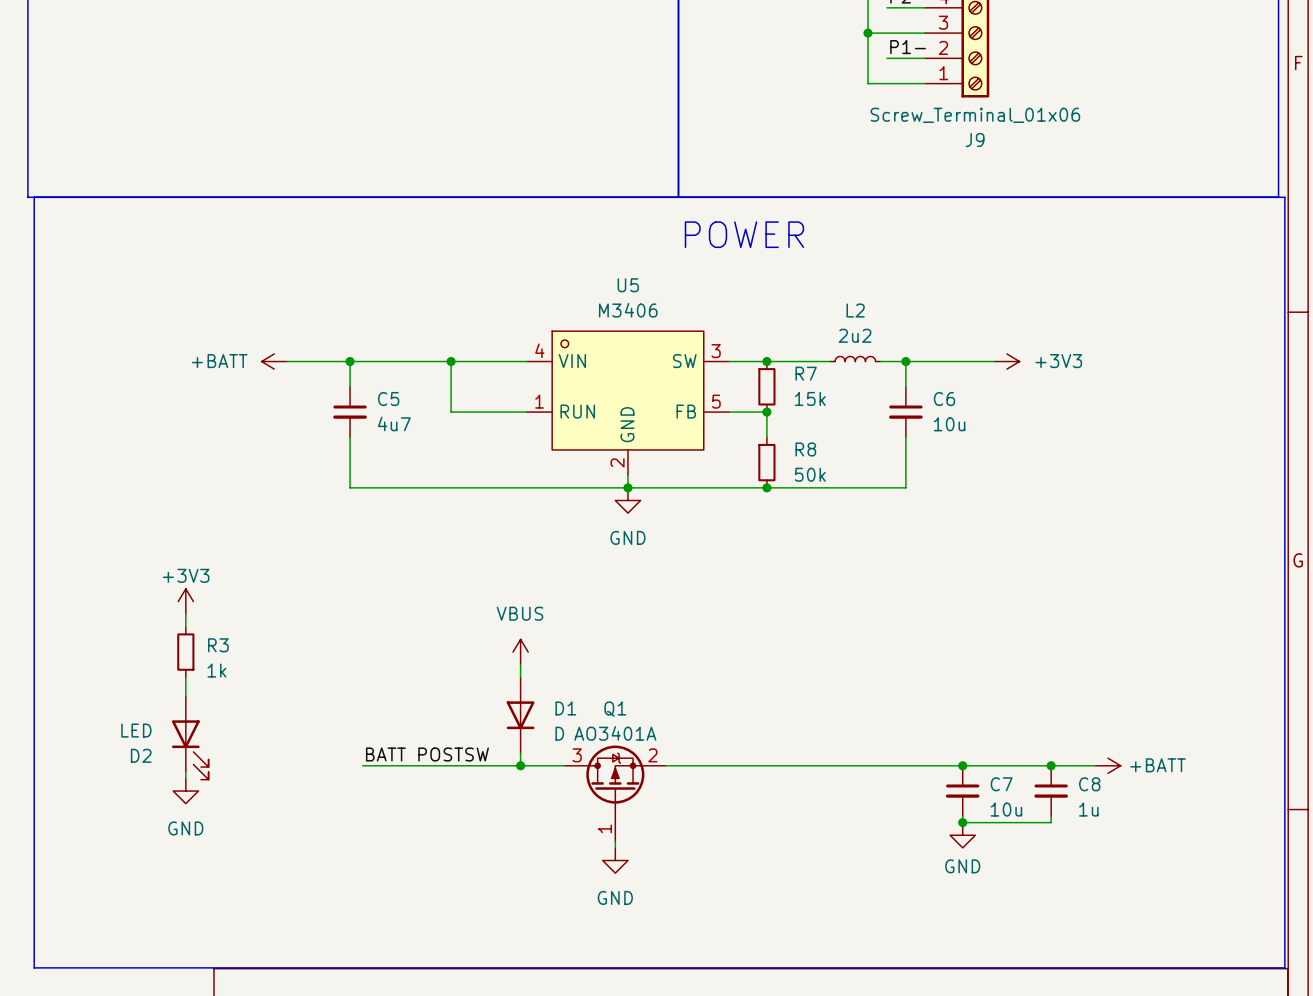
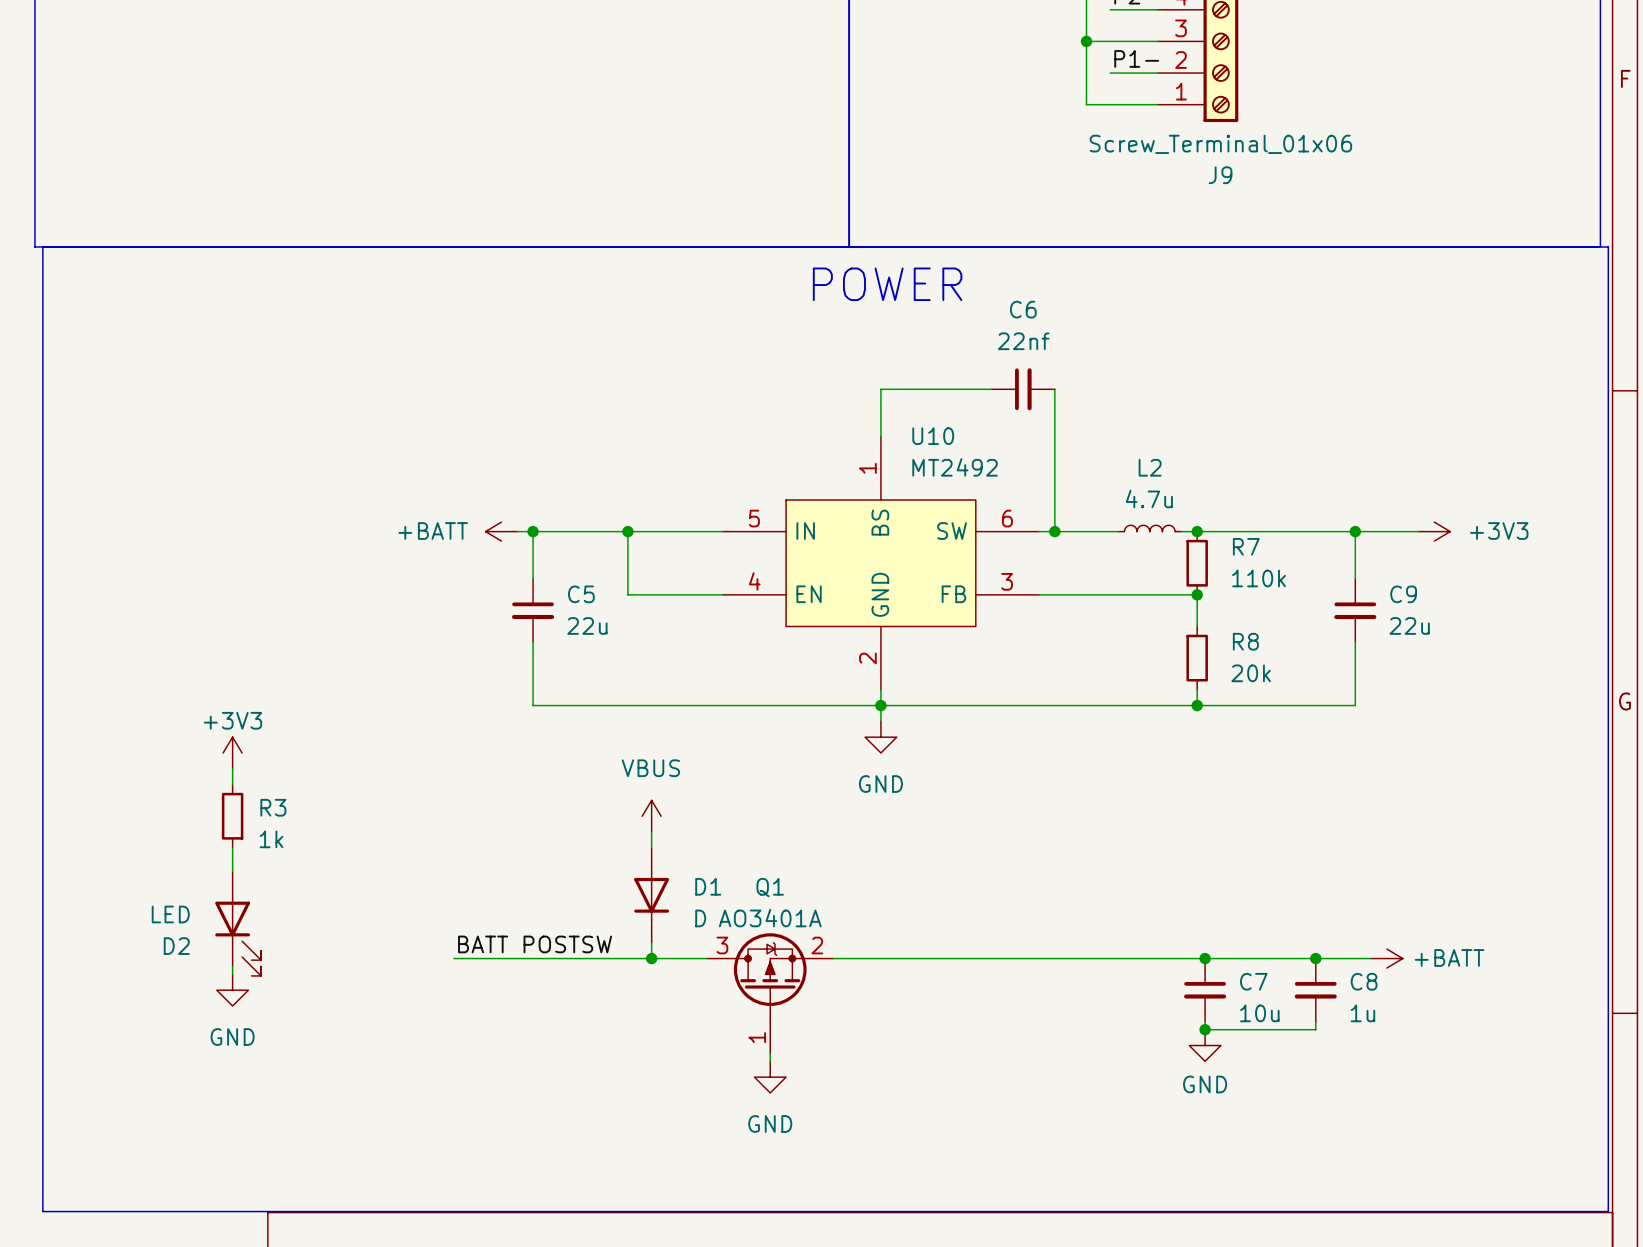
text position: POWER (744, 234) -> POWER (887, 284)
wire: none -> (991, 389) (880, 389) (880, 436)
wire: none -> (1054, 389) (1054, 531)
L2 value: 2u2 (855, 335) -> 4.7u (1149, 499)
L2 position: (855, 359) -> (1149, 528)
power symbol position: +BATT (274, 361) -> +BATT (501, 531)
wire: (286, 361) (526, 361) -> none
wire: (350, 361) (350, 386) -> none
junction: (350, 361) -> none
wire: (451, 361) (451, 412) (526, 412) -> (627, 531) (627, 594) (722, 594)
junction: (451, 361) -> none
wire: (729, 361) (830, 361) -> none
junction: (766, 361) -> none
wire: (880, 361) (994, 361) -> none
wire: (905, 361) (905, 386) -> none
junction: (905, 361) -> none
power symbol position: +3V3 (1006, 361) -> +3V3 (1434, 531)
R7 position: (766, 386) -> (1197, 563)
R7 value: 15k (810, 398) -> 110k (1259, 578)
C6 name position: C6 (944, 399) -> C6 (1023, 309)
U5: M3406 (627, 403) -> none
C5 position: (350, 412) -> (533, 610)
junction: (766, 412) -> none
C6 rotation: 0° (905, 412) -> 90° counterclockwise (1023, 389)
C6 position: (905, 412) -> (1023, 389)
C5 value: 4u7 (394, 423) -> 22u (587, 625)
wire: none -> (517, 531) (722, 531)
wire: none -> (533, 531) (533, 579)
junction: none -> (533, 531)
junction: none -> (627, 531)
wire: none -> (1039, 531) (1118, 531)
junction: none -> (1054, 531)
wire: none -> (1181, 531) (1418, 531)
C6 value: 10u (949, 424) -> 22nf (1023, 341)
junction: none -> (1197, 531)
wire: none -> (1355, 531) (1355, 579)
junction: none -> (1355, 531)
wire: (350, 437) (350, 487) (905, 487) (905, 437) -> none
U10: none -> MT2492 (880, 563)
R8 position: (766, 462) -> (1197, 658)
R8 value: 50k (810, 474) -> 20k (1251, 673)
wire: none -> (1039, 594) (1197, 594) (1197, 626)
junction: none -> (1197, 594)
junction: (627, 487) -> none
junction: (766, 487) -> none
C9: none -> 22u (1355, 610)
power symbol position: GND (627, 500) -> GND (880, 737)
wire: none -> (533, 642) (533, 705) (1355, 705) (1355, 642)
wire: none -> (880, 689) (880, 721)
wire: none -> (1197, 689) (1197, 705)
junction: none -> (880, 705)
junction: none -> (1197, 705)

